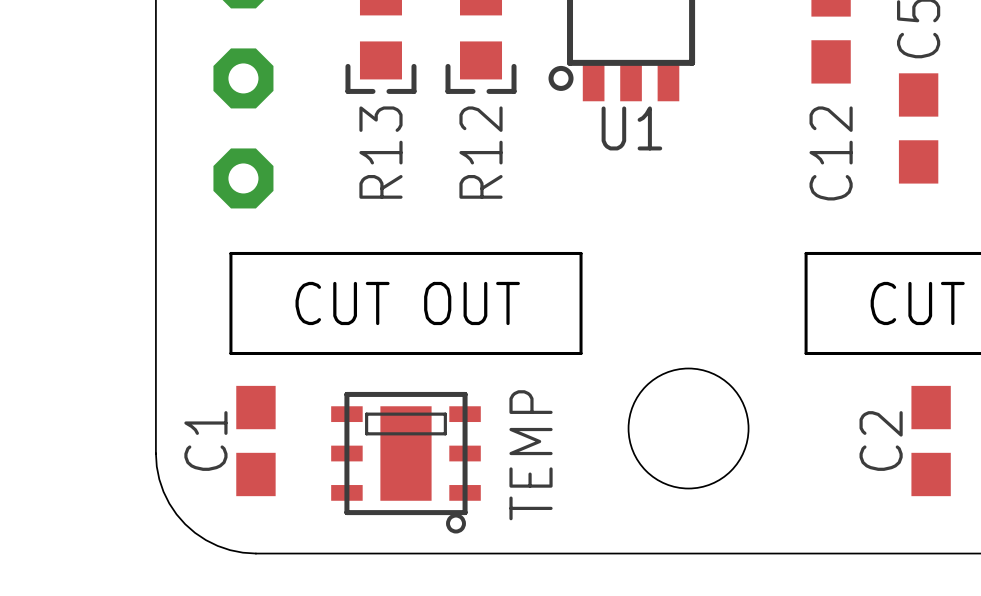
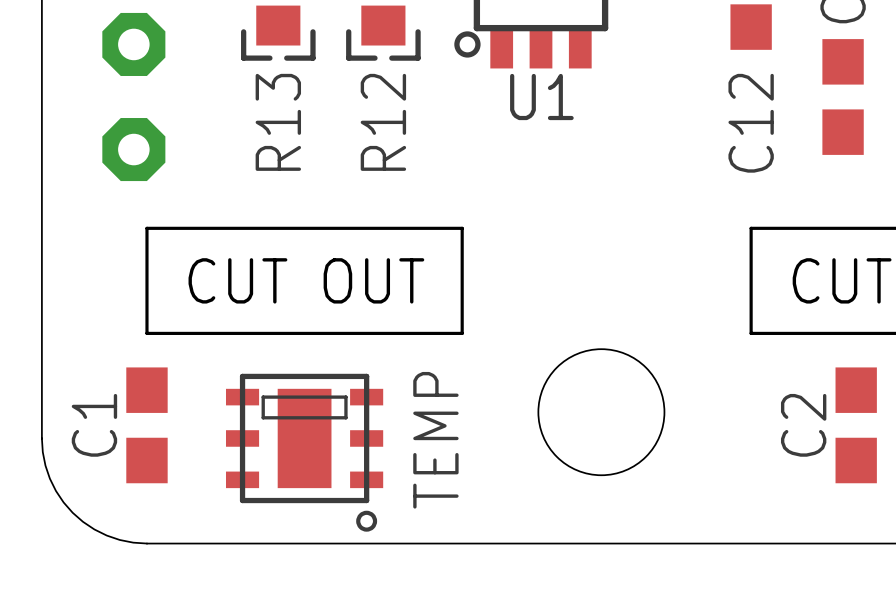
board edge: (255, 253) (230, 253) (230, 353) (255, 353) -> (146, 228) (146, 333)
board edge: (556, 253) (581, 253) (581, 353) (556, 353) -> (462, 228) (462, 333)
board edge: (831, 253) (806, 253) (806, 353) (831, 353) -> (751, 228) (751, 333)
TEMP footprint: [331, 391, 481, 534] -> [225, 373, 384, 532]

